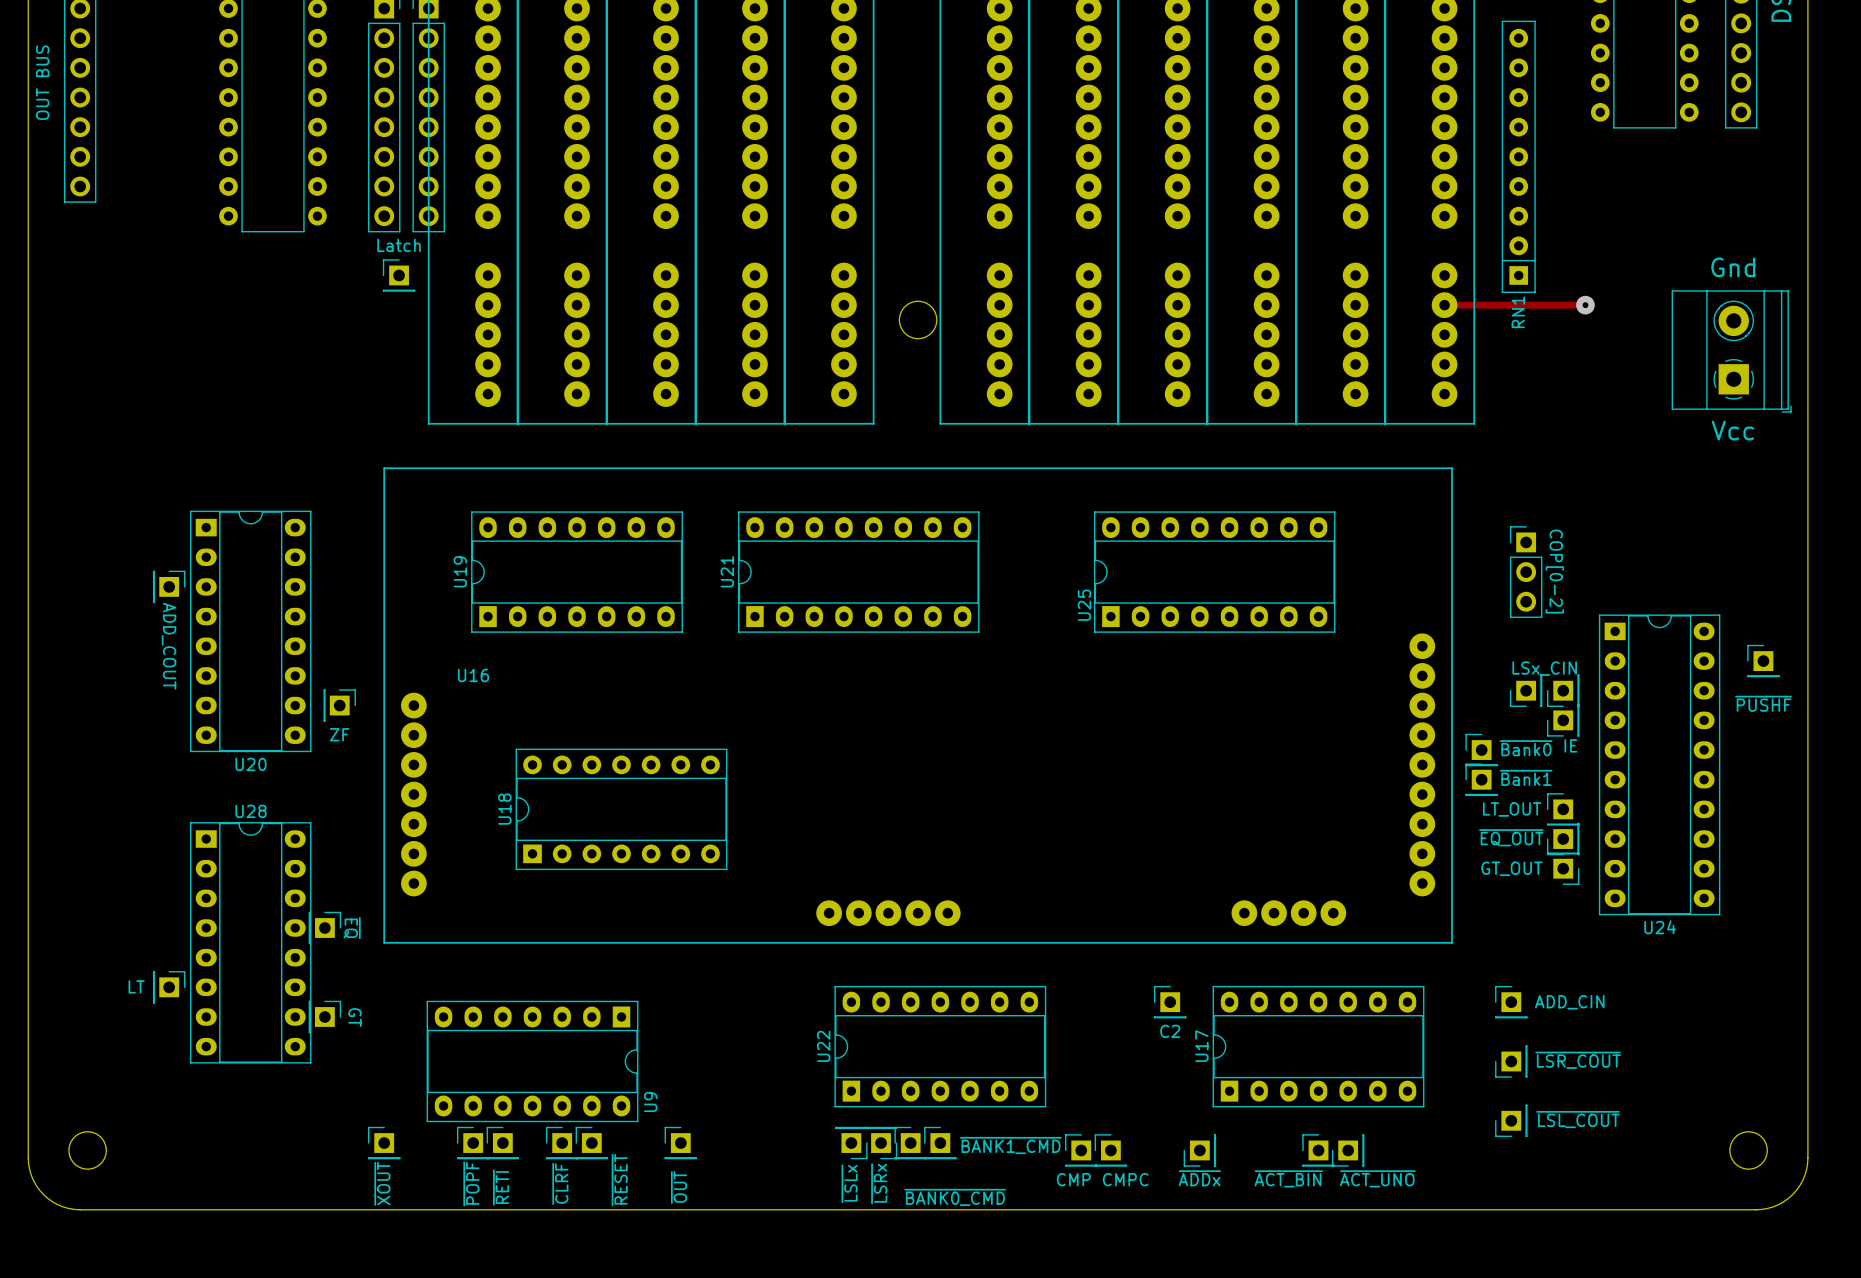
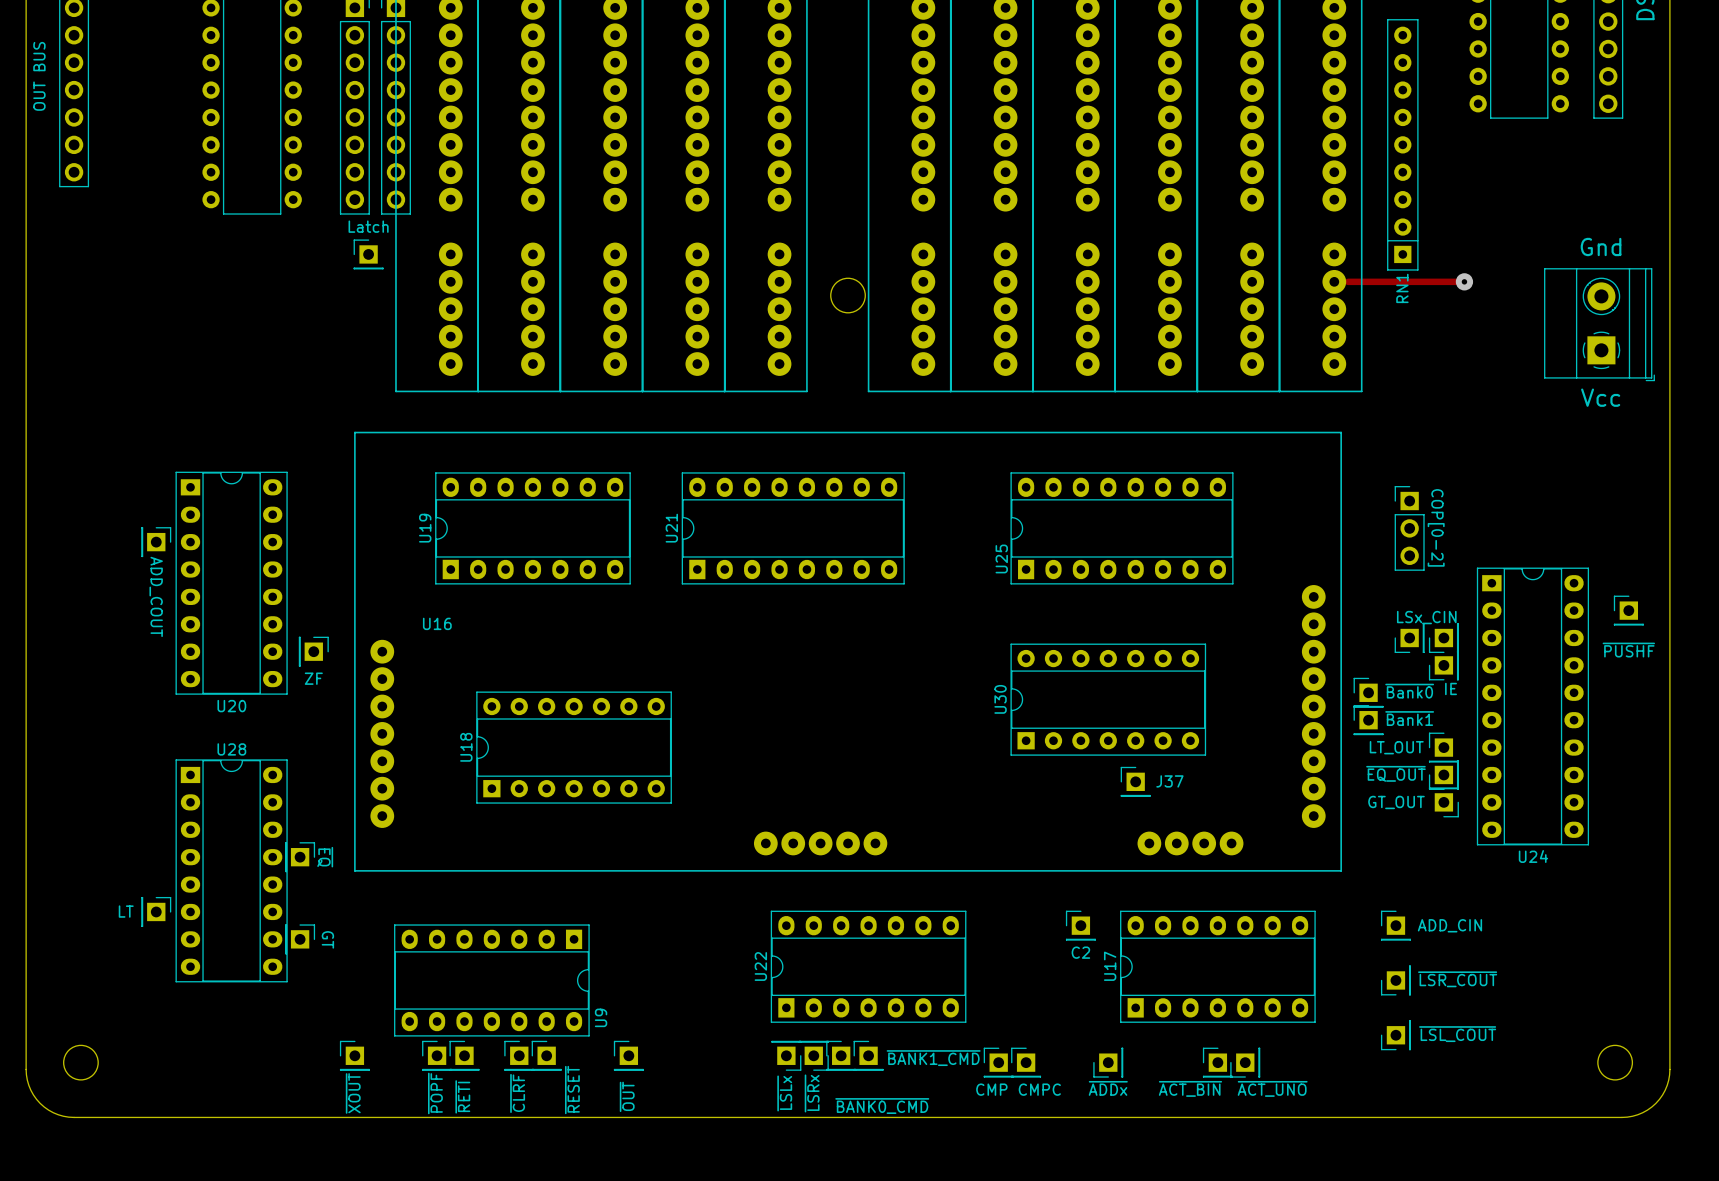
U30: none -> (1108, 699)
J37: none -> (1135, 781)

